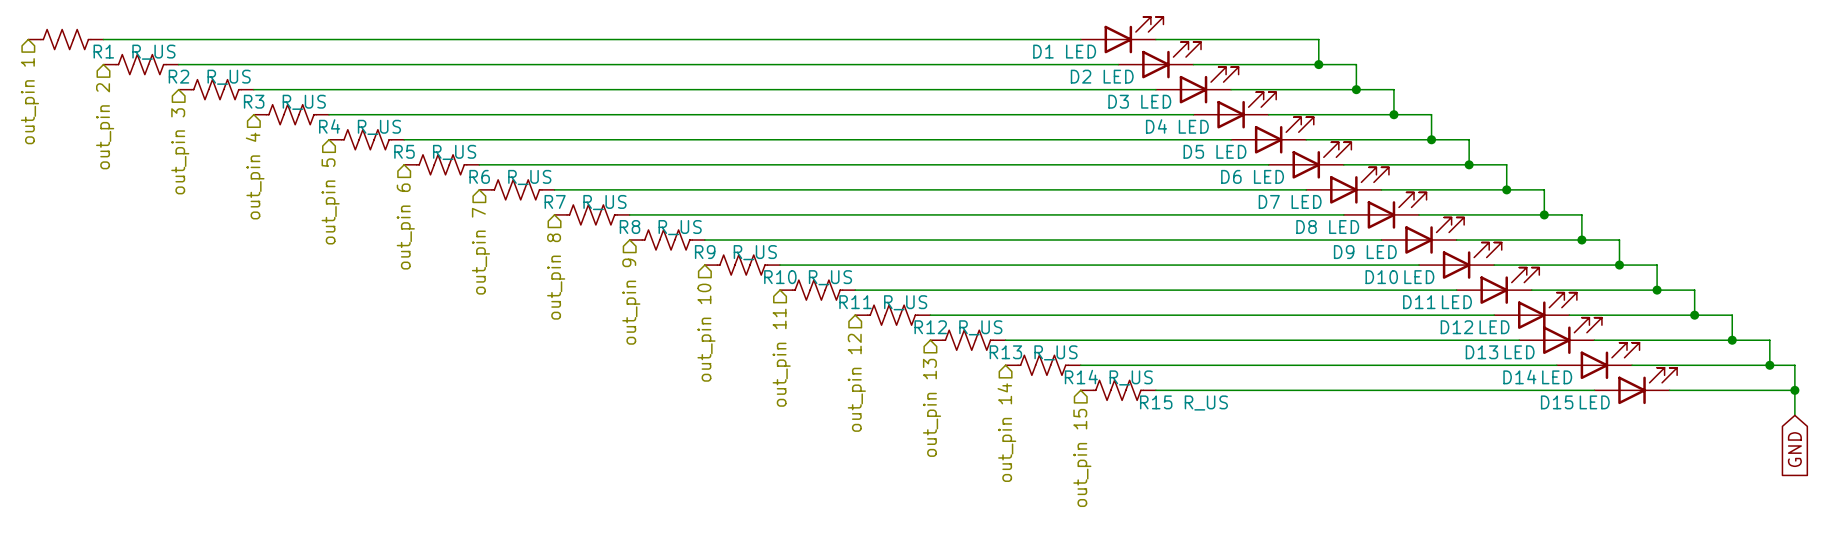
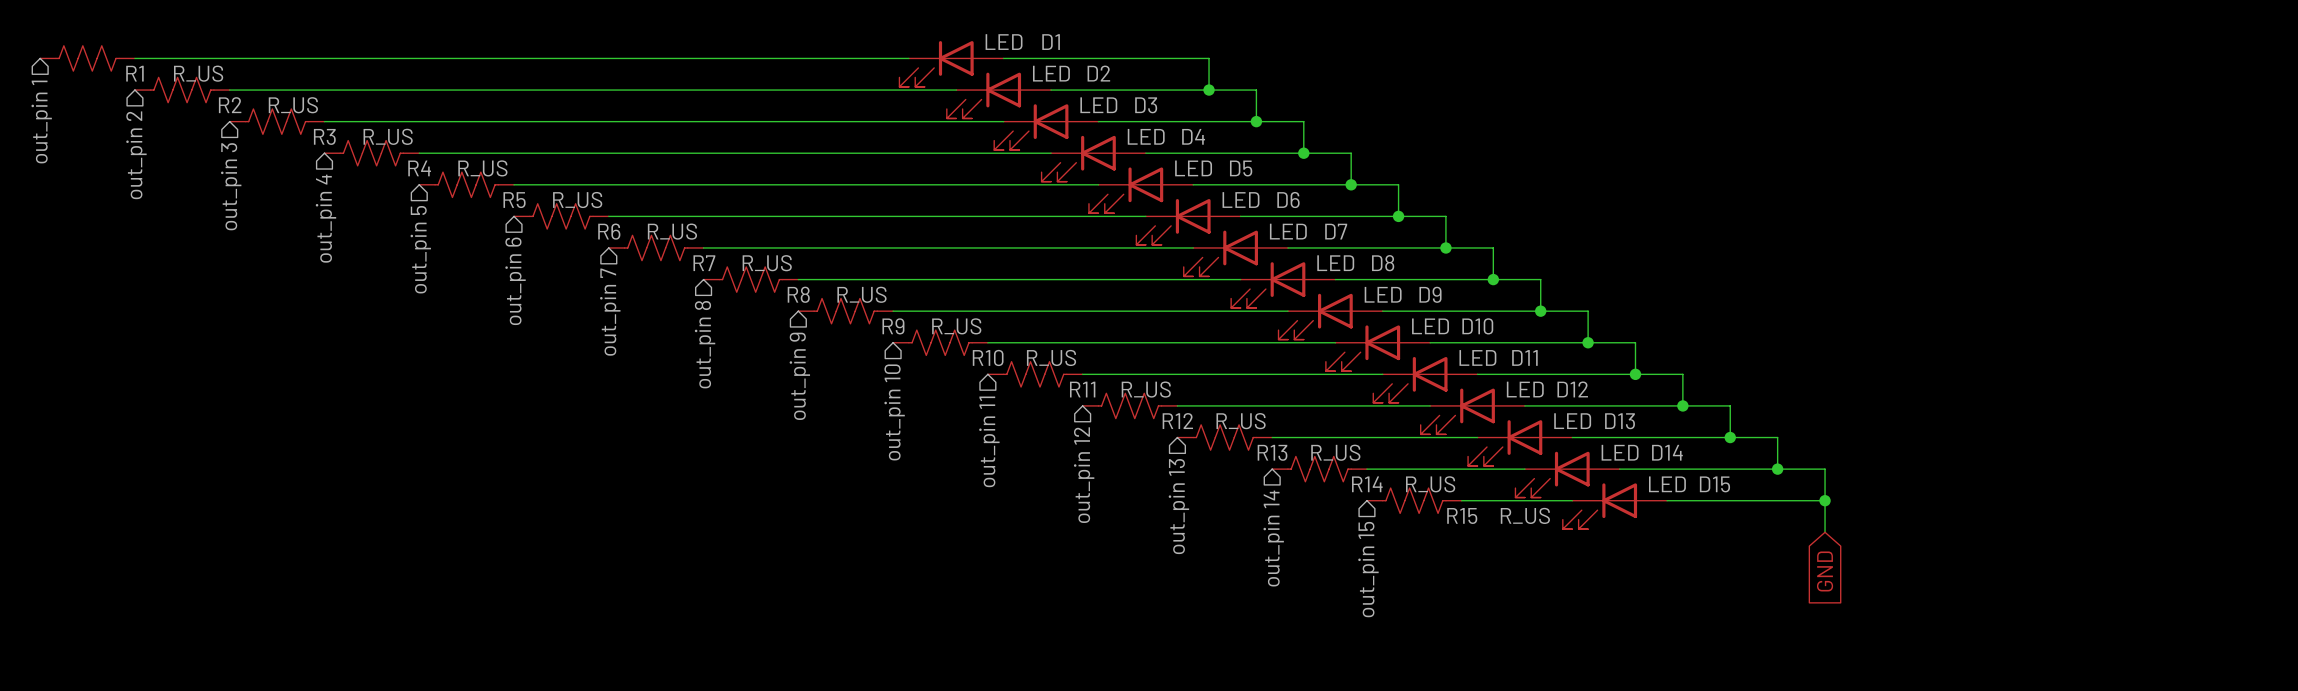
D1 position: (1122, 35) -> (951, 63)
D1 rotation: 0° (1133, 35) -> 180° (936, 63)
wire: (955, 39) (1080, 39) -> (1209, 58) (1209, 90)
wire: (1155, 39) (1318, 39) (1318, 64) -> none
D2 position: (1159, 60) -> (998, 95)
D2 rotation: 0° (1171, 60) -> 180° (983, 95)
junction: none -> (1209, 90)
wire: (993, 64) (1118, 64) -> (1256, 90) (1256, 121)
wire: (1193, 64) (1356, 64) (1356, 89) -> none
junction: (1318, 64) -> none
D3 position: (1197, 85) -> (1046, 127)
D3 rotation: 0° (1209, 85) -> 180° (1031, 127)
junction: none -> (1256, 121)
wire: (1030, 89) (1155, 89) -> (1303, 121) (1303, 153)
wire: (1231, 89) (1393, 89) (1393, 114) -> none
junction: (1356, 89) -> none
D4 position: (1234, 110) -> (1093, 158)
D4 rotation: 0° (1246, 110) -> 180° (1078, 158)
junction: none -> (1303, 153)
wire: (1068, 114) (1193, 114) -> (1351, 153) (1351, 184)
wire: (1268, 114) (1431, 114) (1431, 139) -> none
junction: (1393, 114) -> none
D5 position: (1272, 135) -> (1141, 190)
D5 rotation: 0° (1284, 135) -> 180° (1126, 190)
junction: none -> (1351, 184)
wire: (1105, 139) (1231, 139) -> (1398, 184) (1398, 216)
wire: (1306, 139) (1469, 139) (1469, 164) -> none
junction: (1431, 139) -> none
D6 position: (1310, 160) -> (1188, 221)
D6 rotation: 0° (1321, 160) -> 180° (1173, 221)
junction: none -> (1398, 216)
wire: (1143, 164) (1268, 164) -> (1445, 216) (1445, 247)
wire: (1343, 164) (1506, 164) (1506, 189) -> none
junction: (1469, 164) -> none
D7 position: (1347, 185) -> (1235, 253)
D7 rotation: 0° (1359, 185) -> 180° (1220, 253)
junction: none -> (1445, 247)
wire: (1180, 189) (1306, 189) -> (1493, 247) (1493, 279)
wire: (1381, 189) (1544, 189) (1544, 214) -> none
junction: (1506, 189) -> none
D8 position: (1385, 210) -> (1283, 285)
D8 rotation: 0° (1397, 210) -> 180° (1268, 285)
junction: none -> (1493, 279)
wire: (1218, 214) (1343, 214) -> (1540, 279) (1540, 311)
wire: (1419, 214) (1581, 214) (1581, 240) -> none
junction: (1544, 214) -> none
D9 position: (1422, 235) -> (1330, 316)
D9 rotation: 0° (1434, 235) -> 180° (1315, 316)
junction: none -> (1540, 311)
wire: (1256, 240) (1381, 240) -> (1588, 311) (1588, 342)
wire: (1456, 240) (1619, 240) (1619, 265) -> none
junction: (1581, 240) -> none
D10 position: (1460, 260) -> (1378, 348)
D10 rotation: 0° (1472, 260) -> 180° (1363, 348)
junction: none -> (1588, 342)
wire: (1293, 265) (1419, 265) -> (1635, 342) (1635, 374)
wire: (1494, 265) (1657, 265) (1657, 290) -> none
junction: (1619, 265) -> none
D11 position: (1497, 285) -> (1425, 379)
D11 rotation: 0° (1509, 285) -> 180° (1410, 379)
junction: none -> (1635, 374)
wire: (1331, 290) (1456, 290) -> (1682, 374) (1682, 405)
wire: (1531, 290) (1694, 290) (1694, 315) -> none
junction: (1657, 290) -> none
D12 position: (1535, 310) -> (1472, 411)
D12 rotation: 0° (1547, 310) -> 180° (1457, 411)
junction: none -> (1682, 405)
wire: (1368, 315) (1494, 315) -> (1730, 405) (1730, 437)
wire: (1569, 315) (1732, 315) (1732, 340) -> none
junction: (1694, 315) -> none
D13 position: (1560, 335) -> (1520, 443)
D13 rotation: 0° (1572, 335) -> 180° (1505, 443)
junction: none -> (1730, 437)
wire: (1406, 340) (1519, 340) -> (1777, 437) (1777, 469)
wire: (1594, 340) (1769, 340) (1769, 365) -> none
junction: (1732, 340) -> none
D14 position: (1598, 360) -> (1567, 474)
D14 rotation: 0° (1610, 360) -> 180° (1552, 474)
junction: none -> (1777, 469)
wire: (1444, 365) (1556, 365) -> (1825, 469) (1825, 532)
wire: (1632, 365) (1794, 365) (1794, 415) -> none
junction: (1769, 365) -> none
D15 position: (1635, 385) -> (1614, 506)
D15 rotation: 0° (1647, 385) -> 180° (1599, 506)
wire: (1444, 390) (1594, 390) -> none
junction: none -> (1825, 500)
wire: (1669, 390) (1794, 390) -> none
junction: (1794, 390) -> none
global label: none -> GND (1825, 571)
global label: GND (1794, 449) -> none

